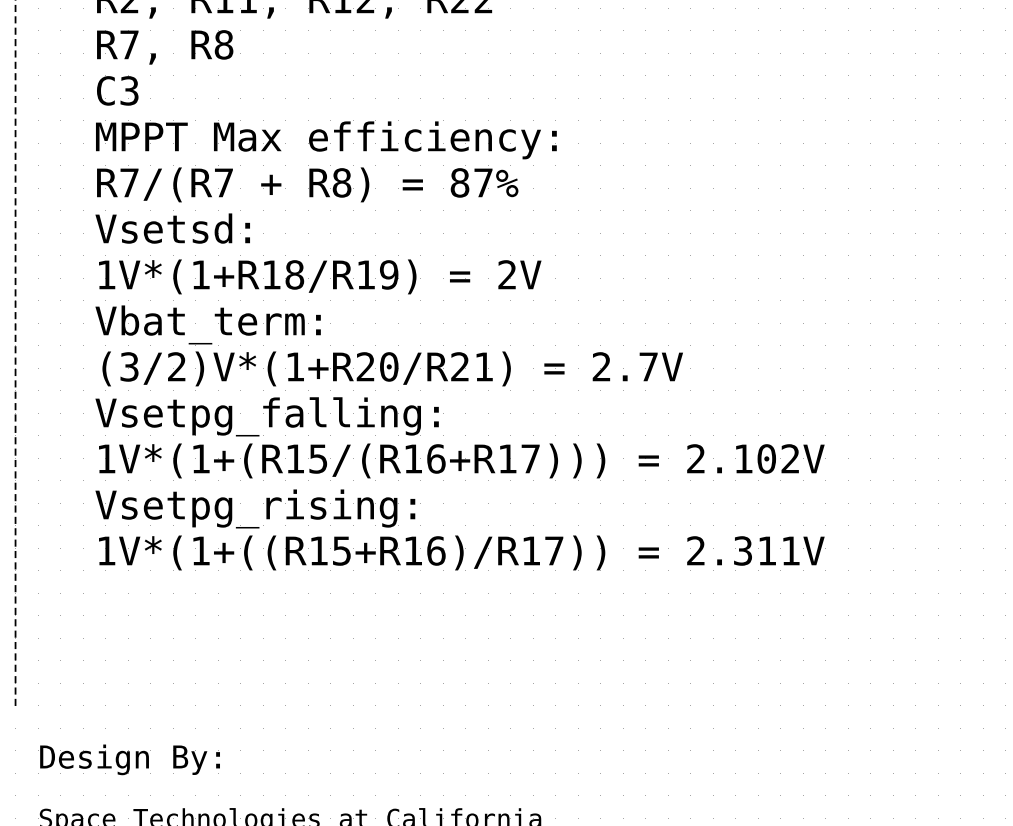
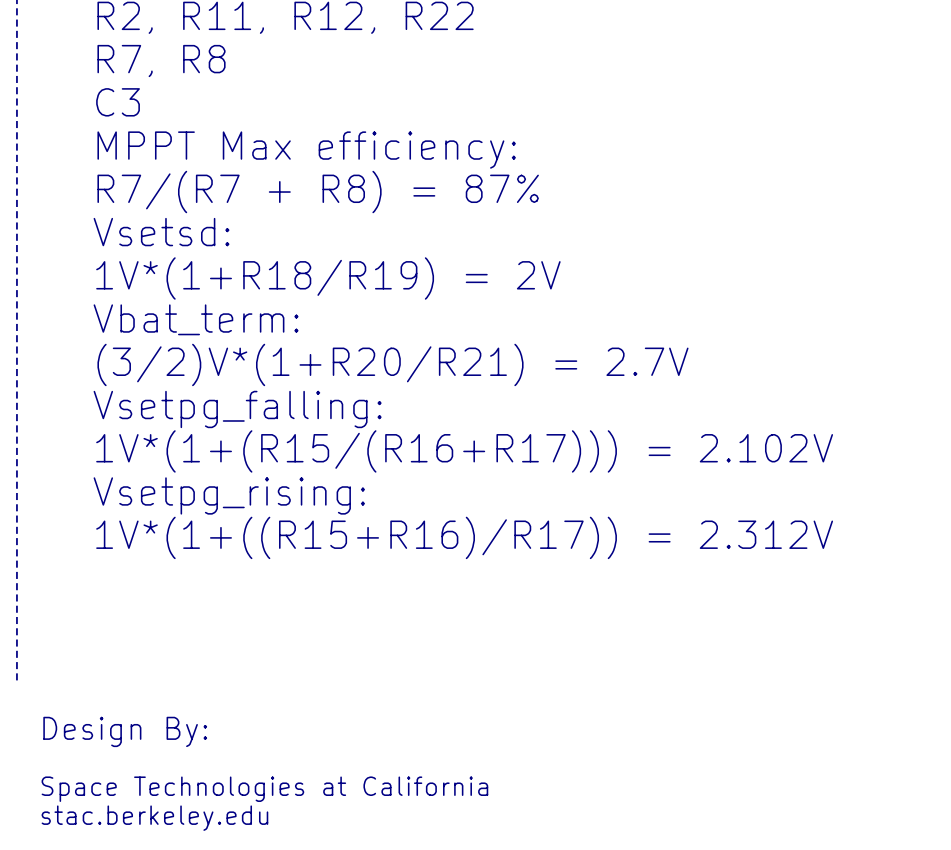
text: 1V*(1+((R15+R16)/R17)) = 2.311V (461, 552) -> 1V*(1+((R15+R16)/R17)) = 2.312V (464, 537)

